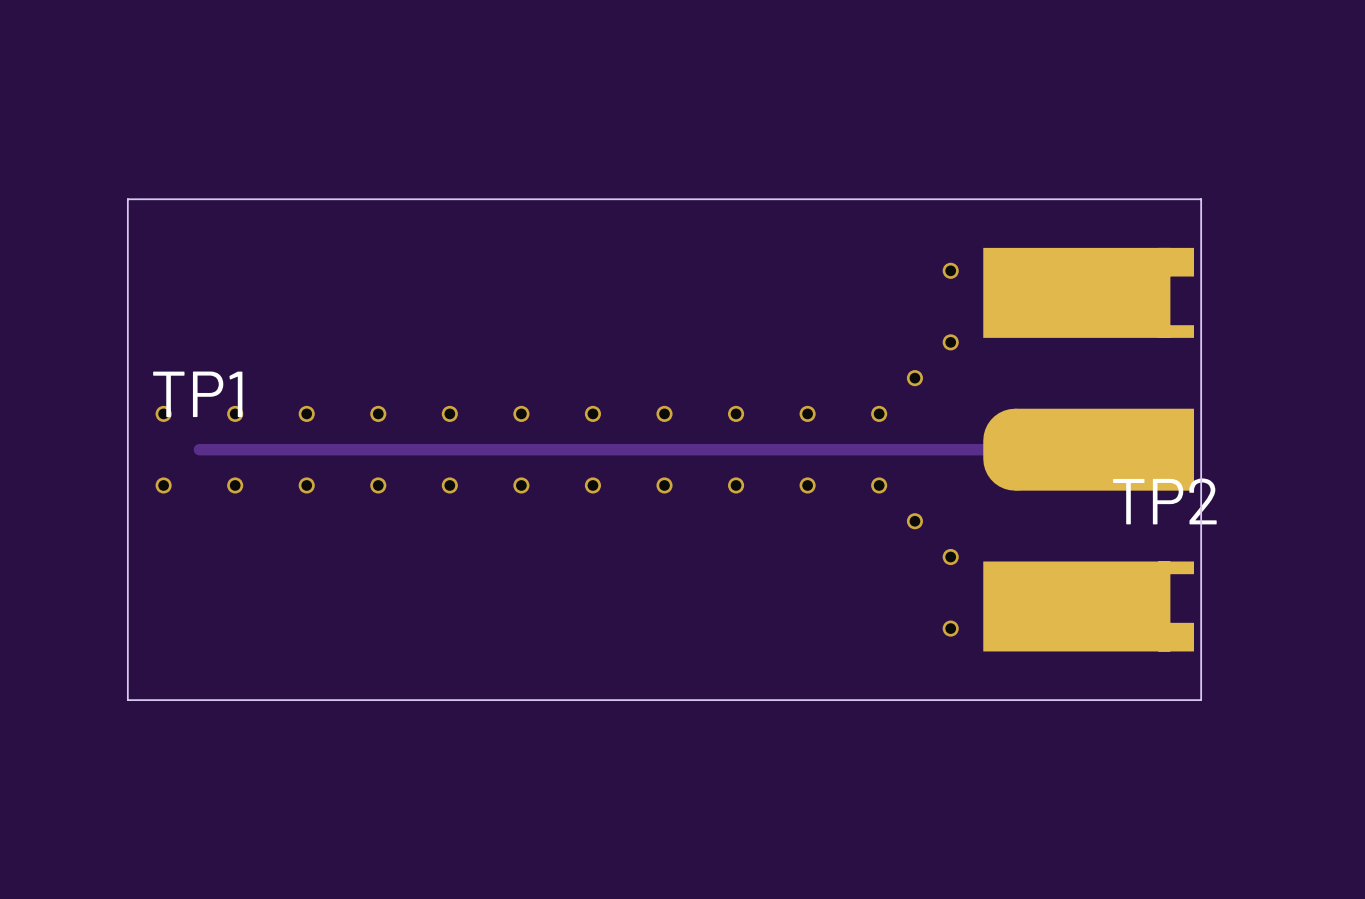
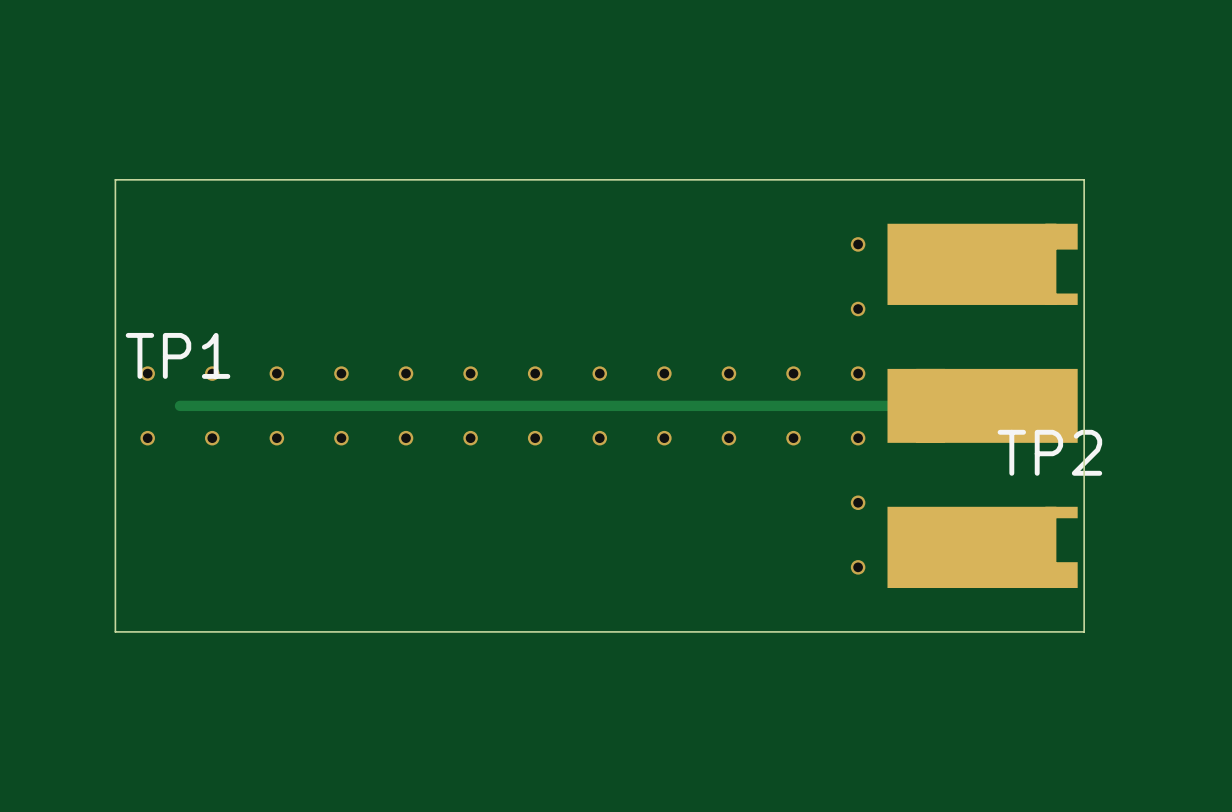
part footprint: [983, 247, 1194, 652] -> [887, 223, 1078, 589]
via position: (914, 378) -> (858, 373)
via position: (914, 521) -> (858, 438)

